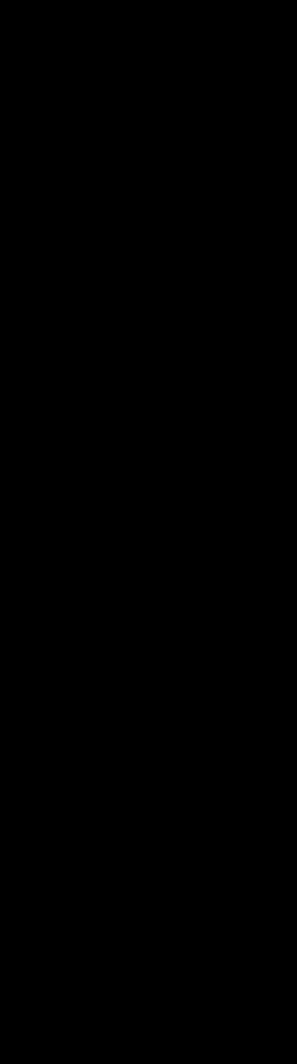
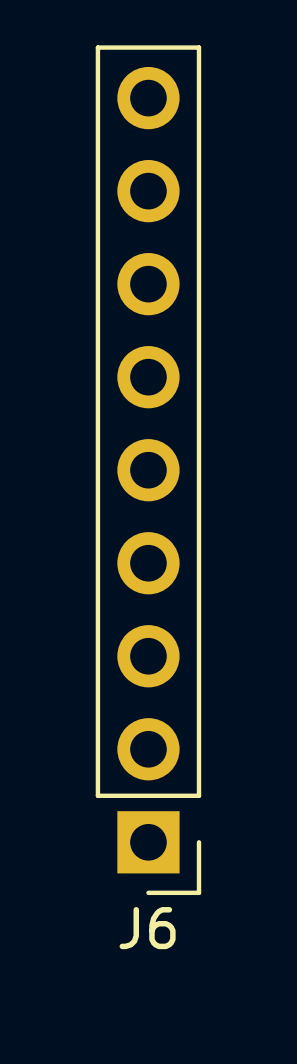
J6: none -> (148, 470)

